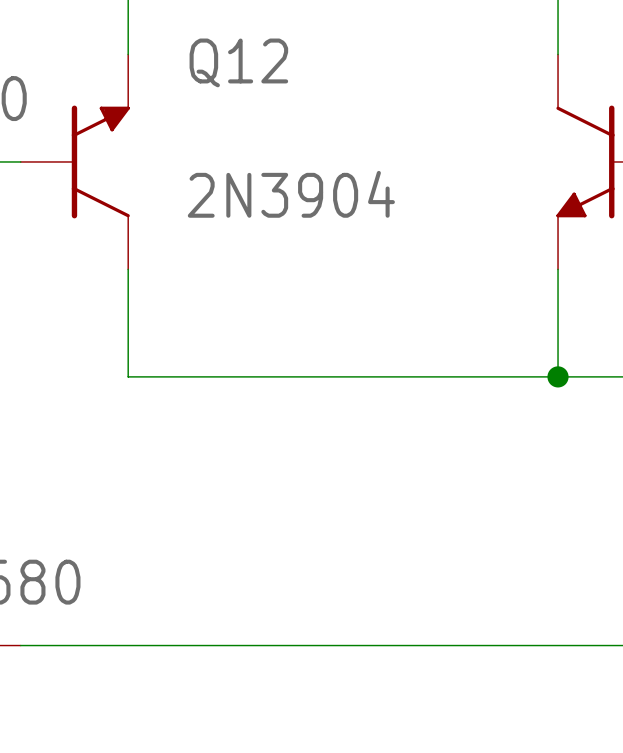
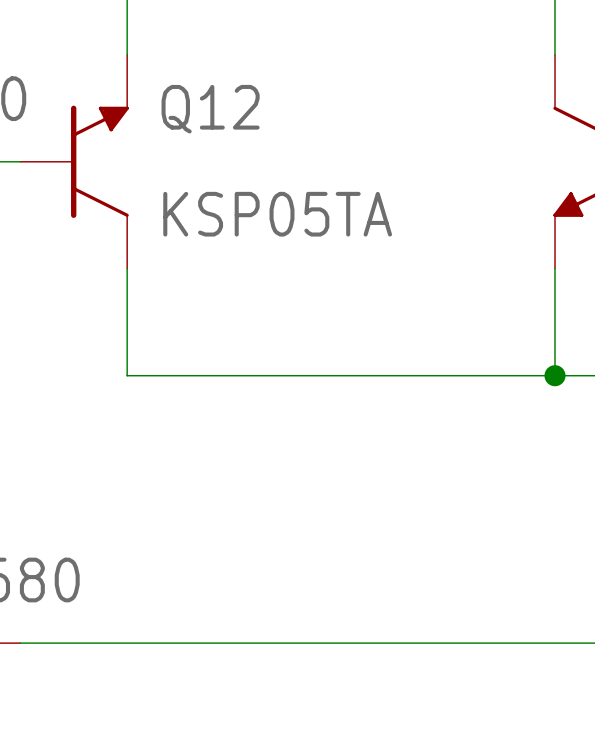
Q12 name position: Q12 (238, 62) -> Q12 (210, 109)
Q12 value: 2N3904 (291, 194) -> KSP05TA (277, 214)

